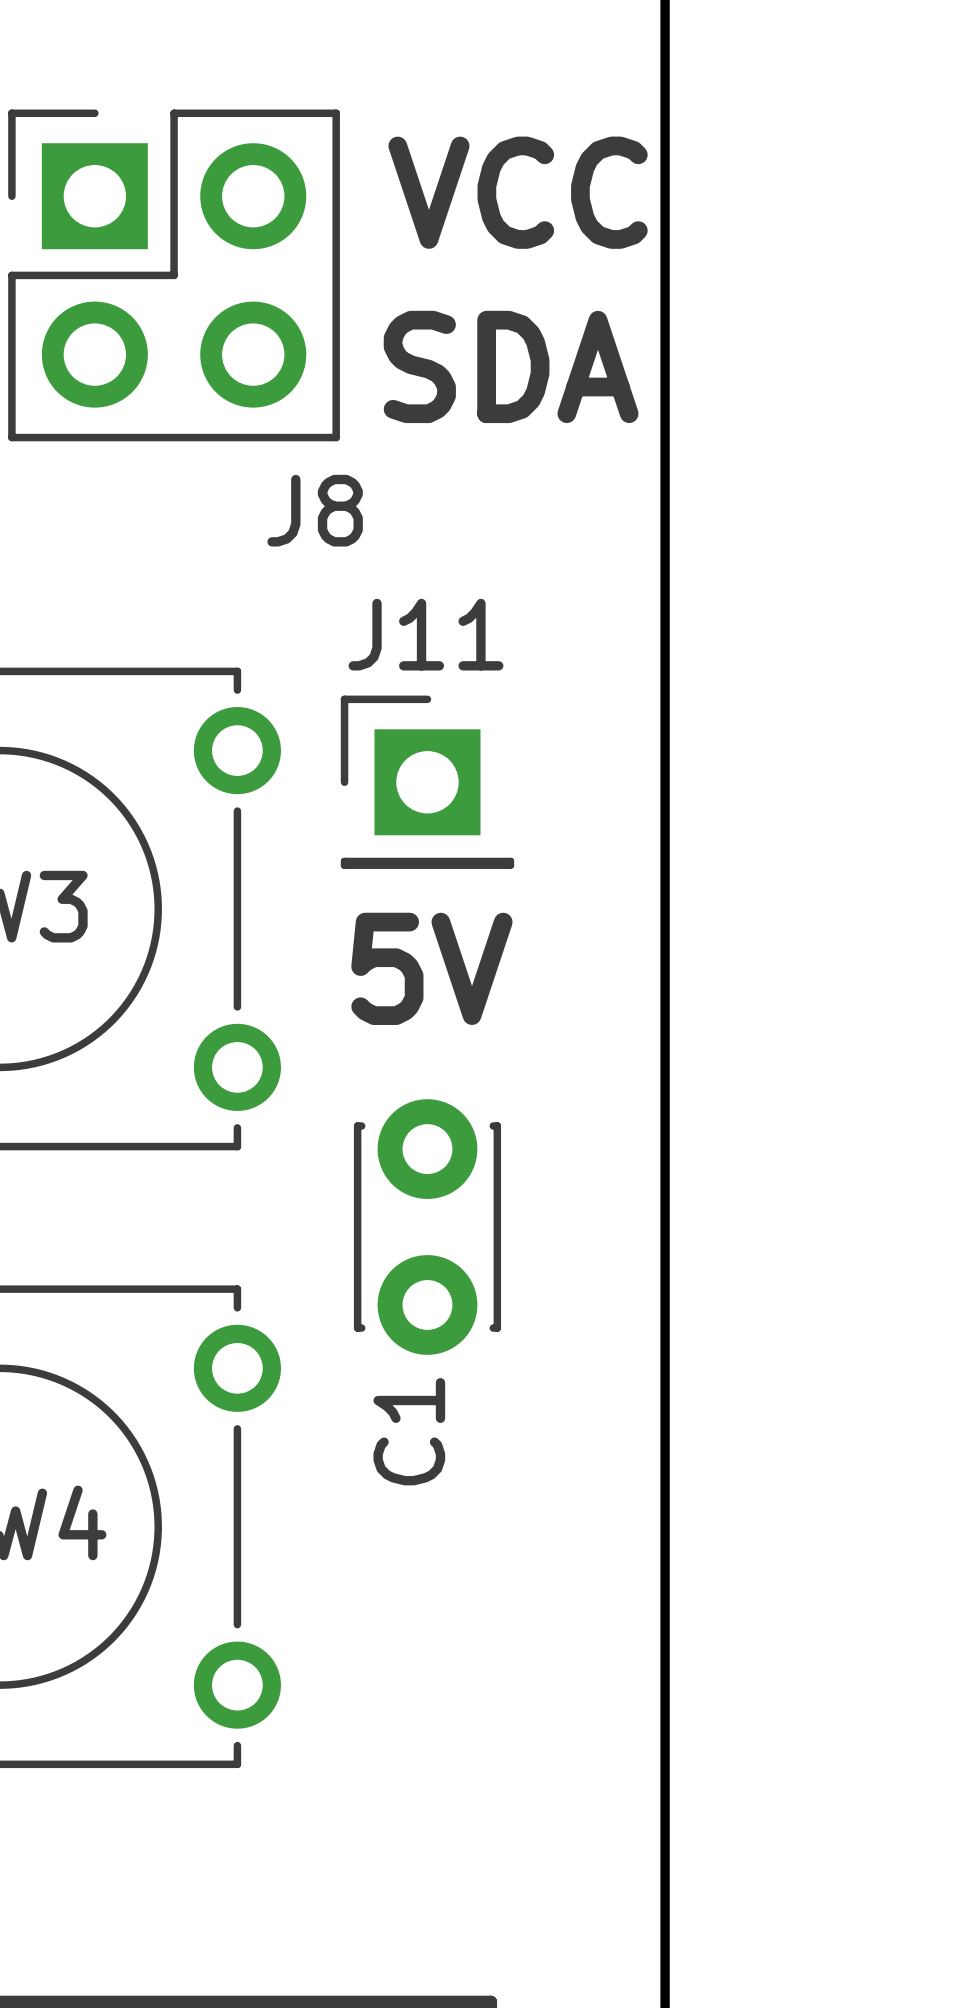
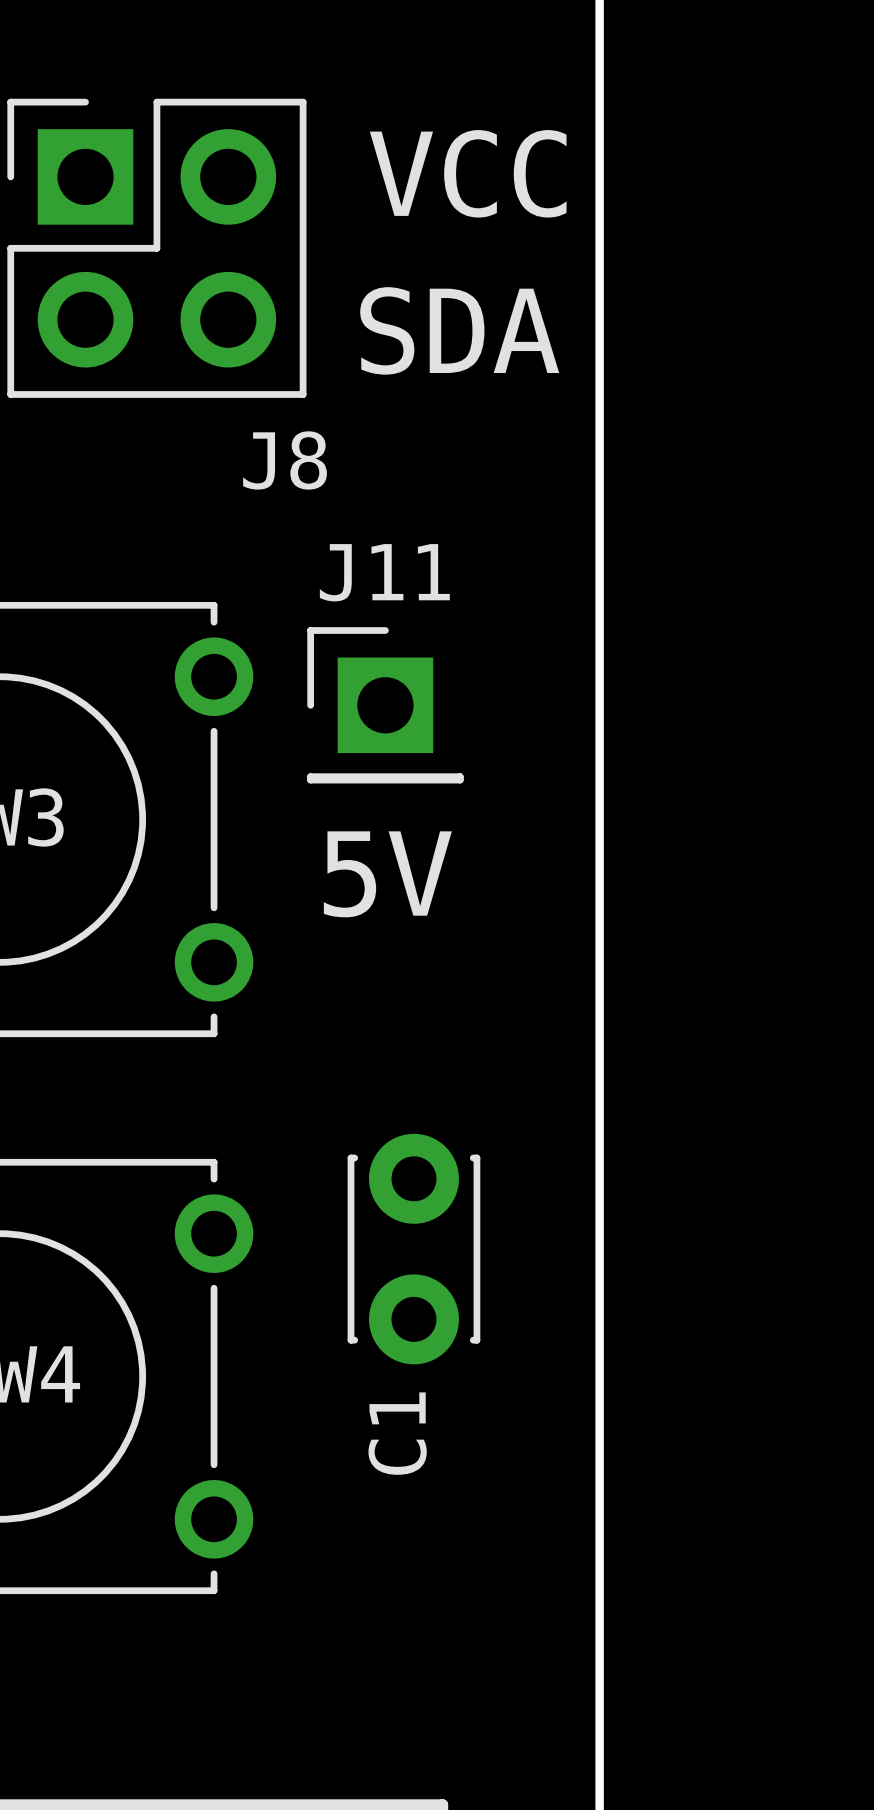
C1 position: (427, 1227) -> (413, 1249)

